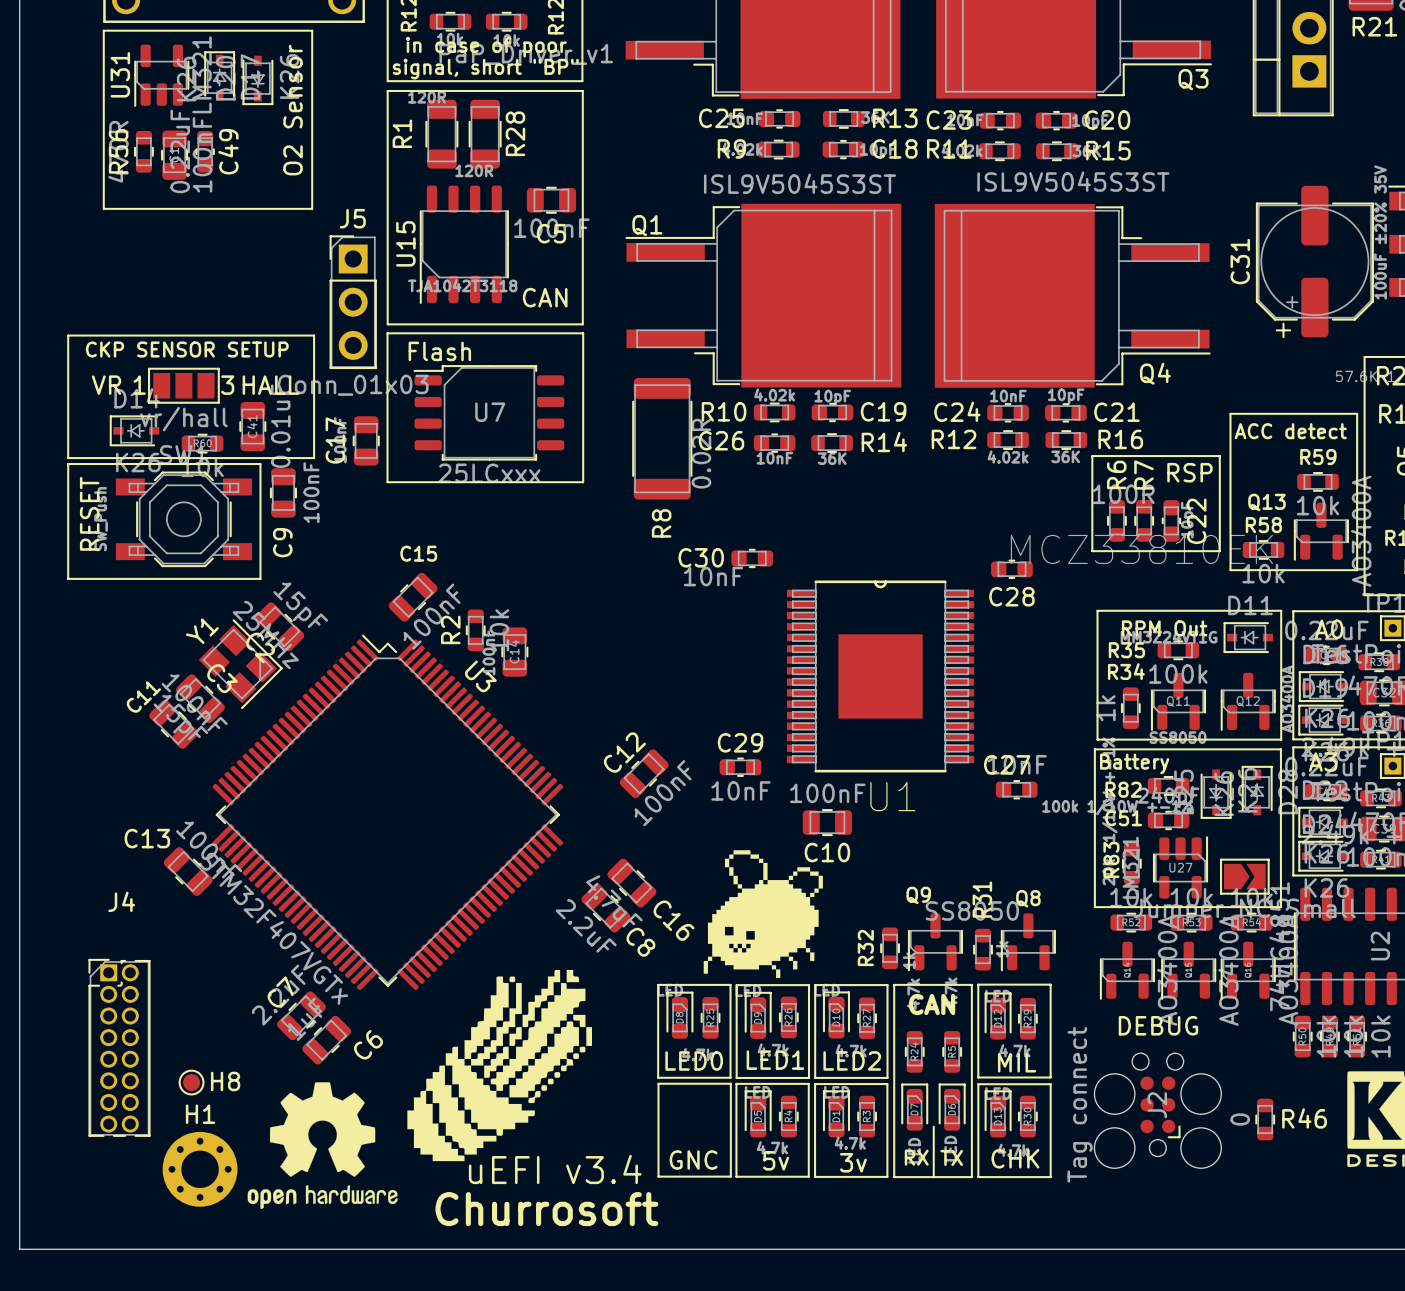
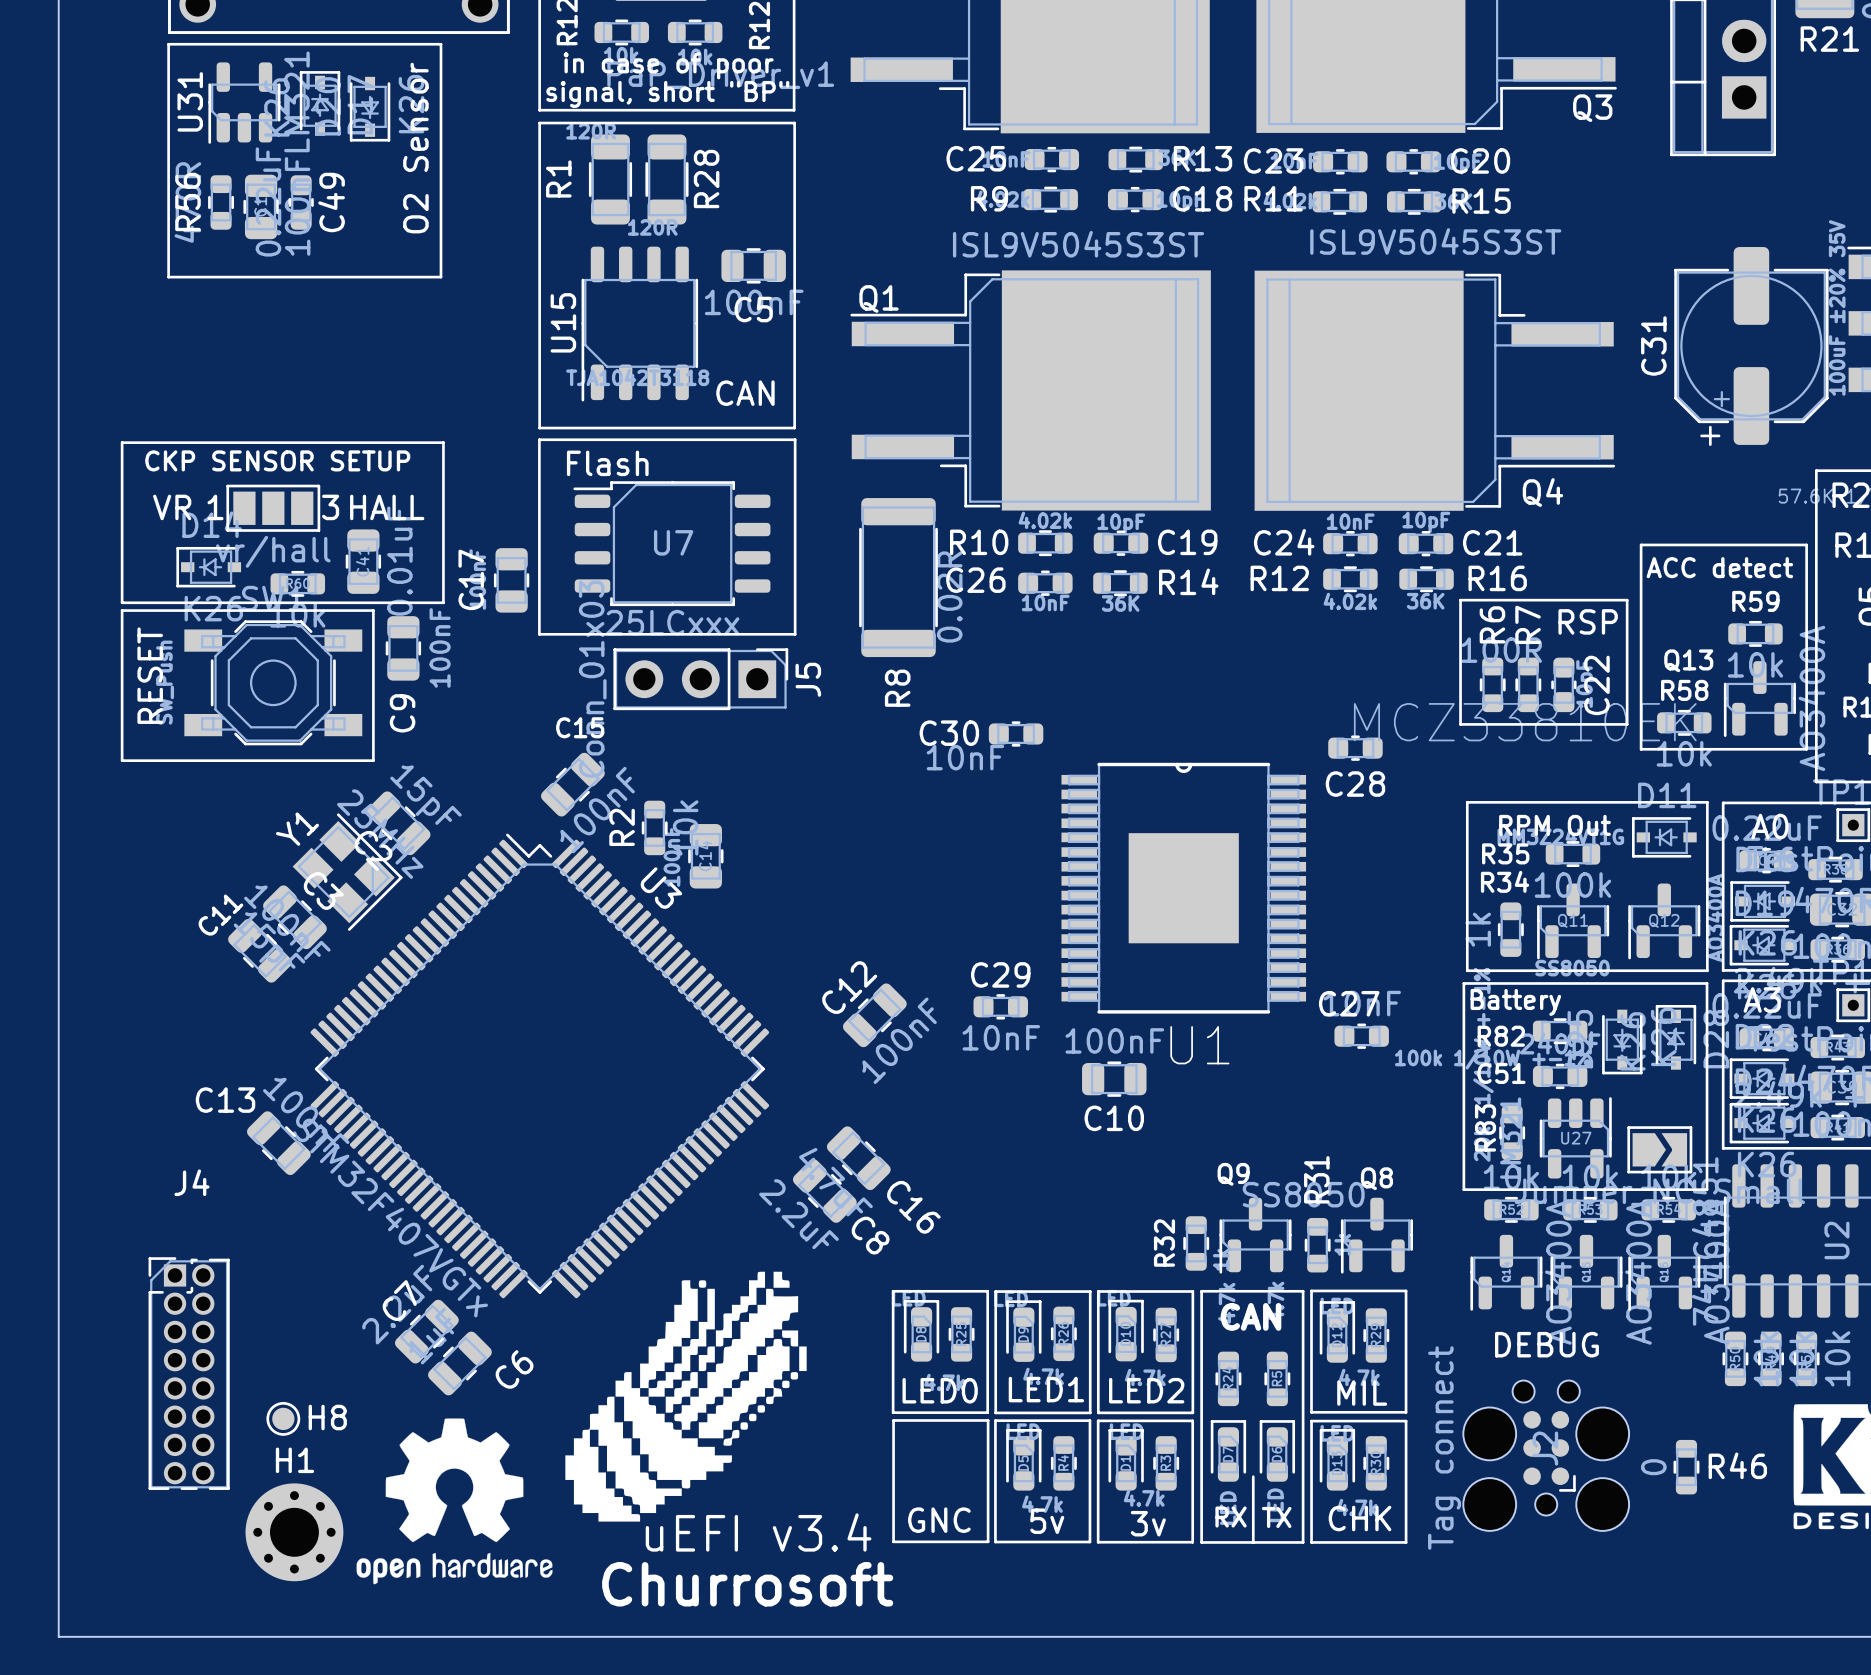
J5 rotation: 0° (353, 302) -> 90° clockwise (700, 679)
J5 position: (353, 302) -> (700, 679)
drawing: [703, 850, 823, 978] -> none

